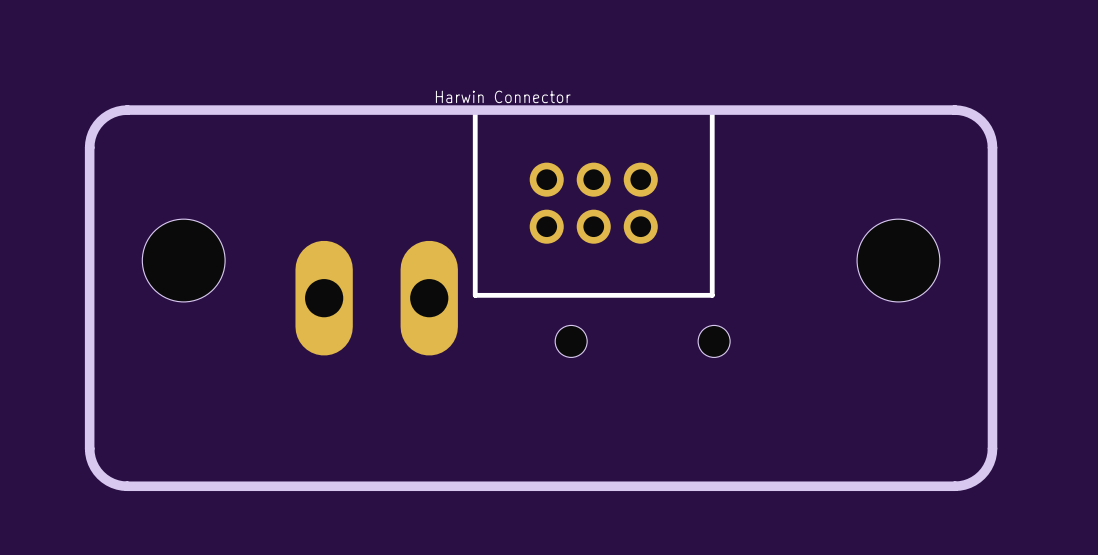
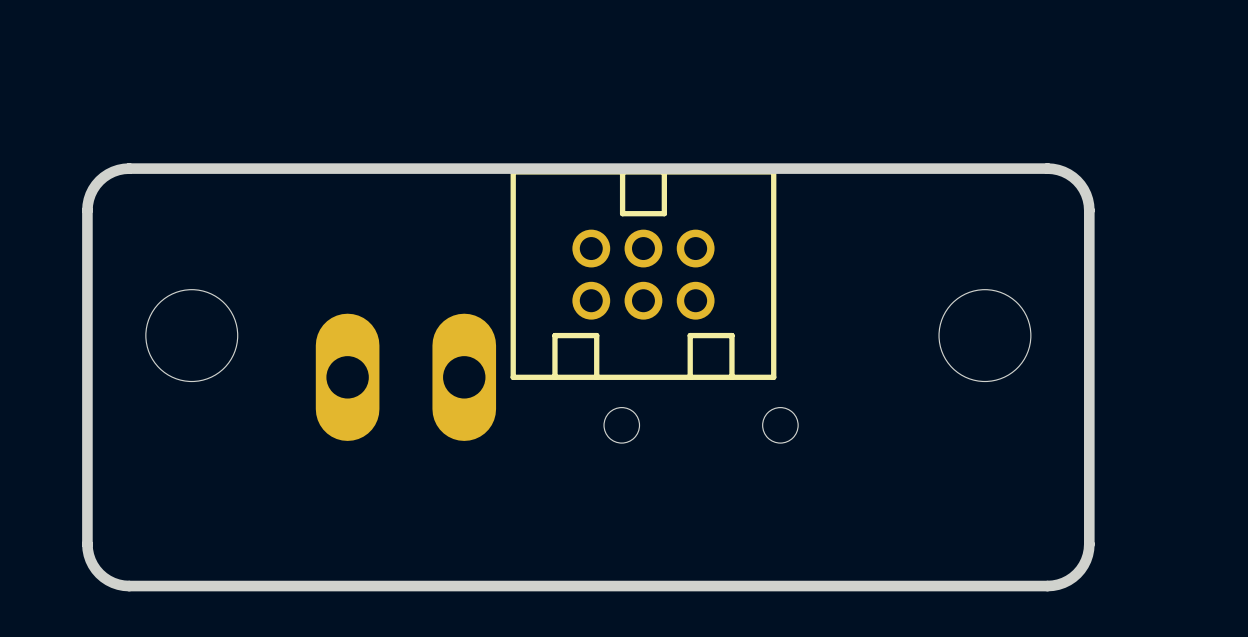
part footprint: [472, 108, 715, 298] -> [510, 169, 777, 380]

